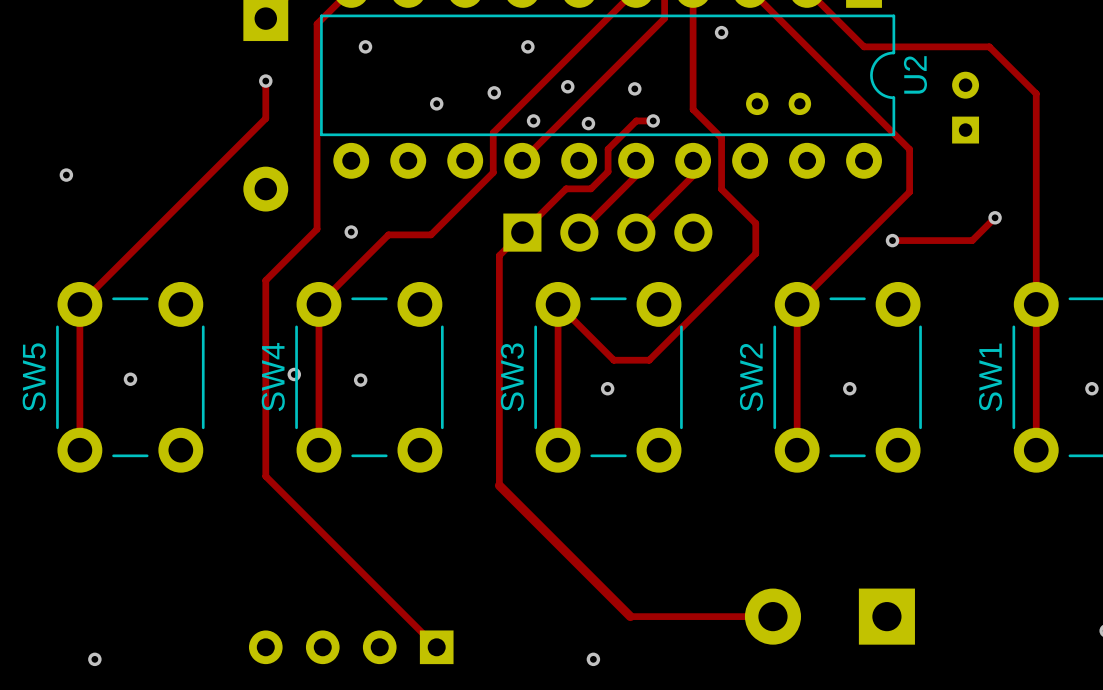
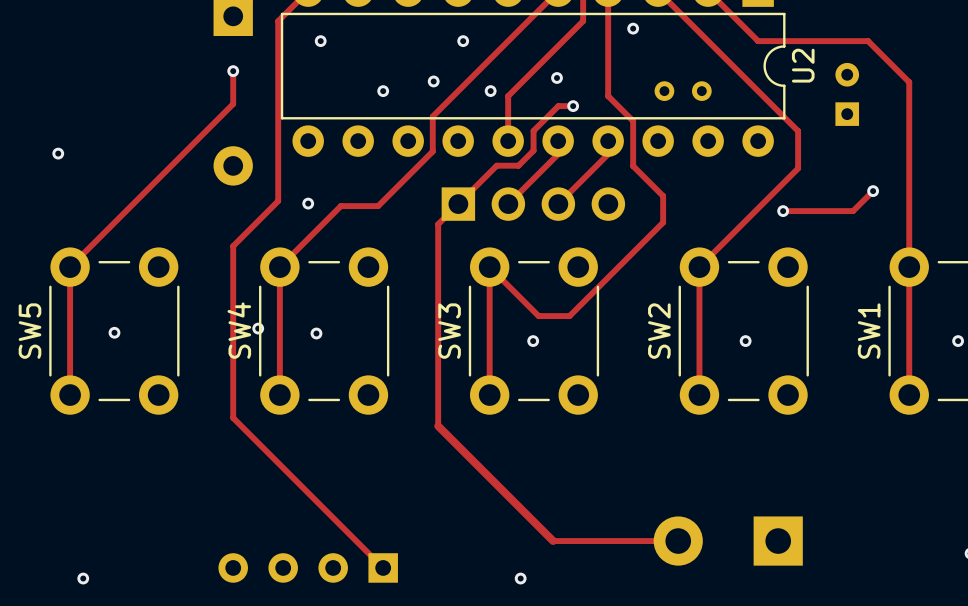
track: (664, 18) (522, 160) -> (583, 16) (583, 21) (508, 96) (508, 141)
via: (567, 86) -> none
via: none -> (490, 91)
via: (533, 120) -> none
via: (588, 123) -> none

